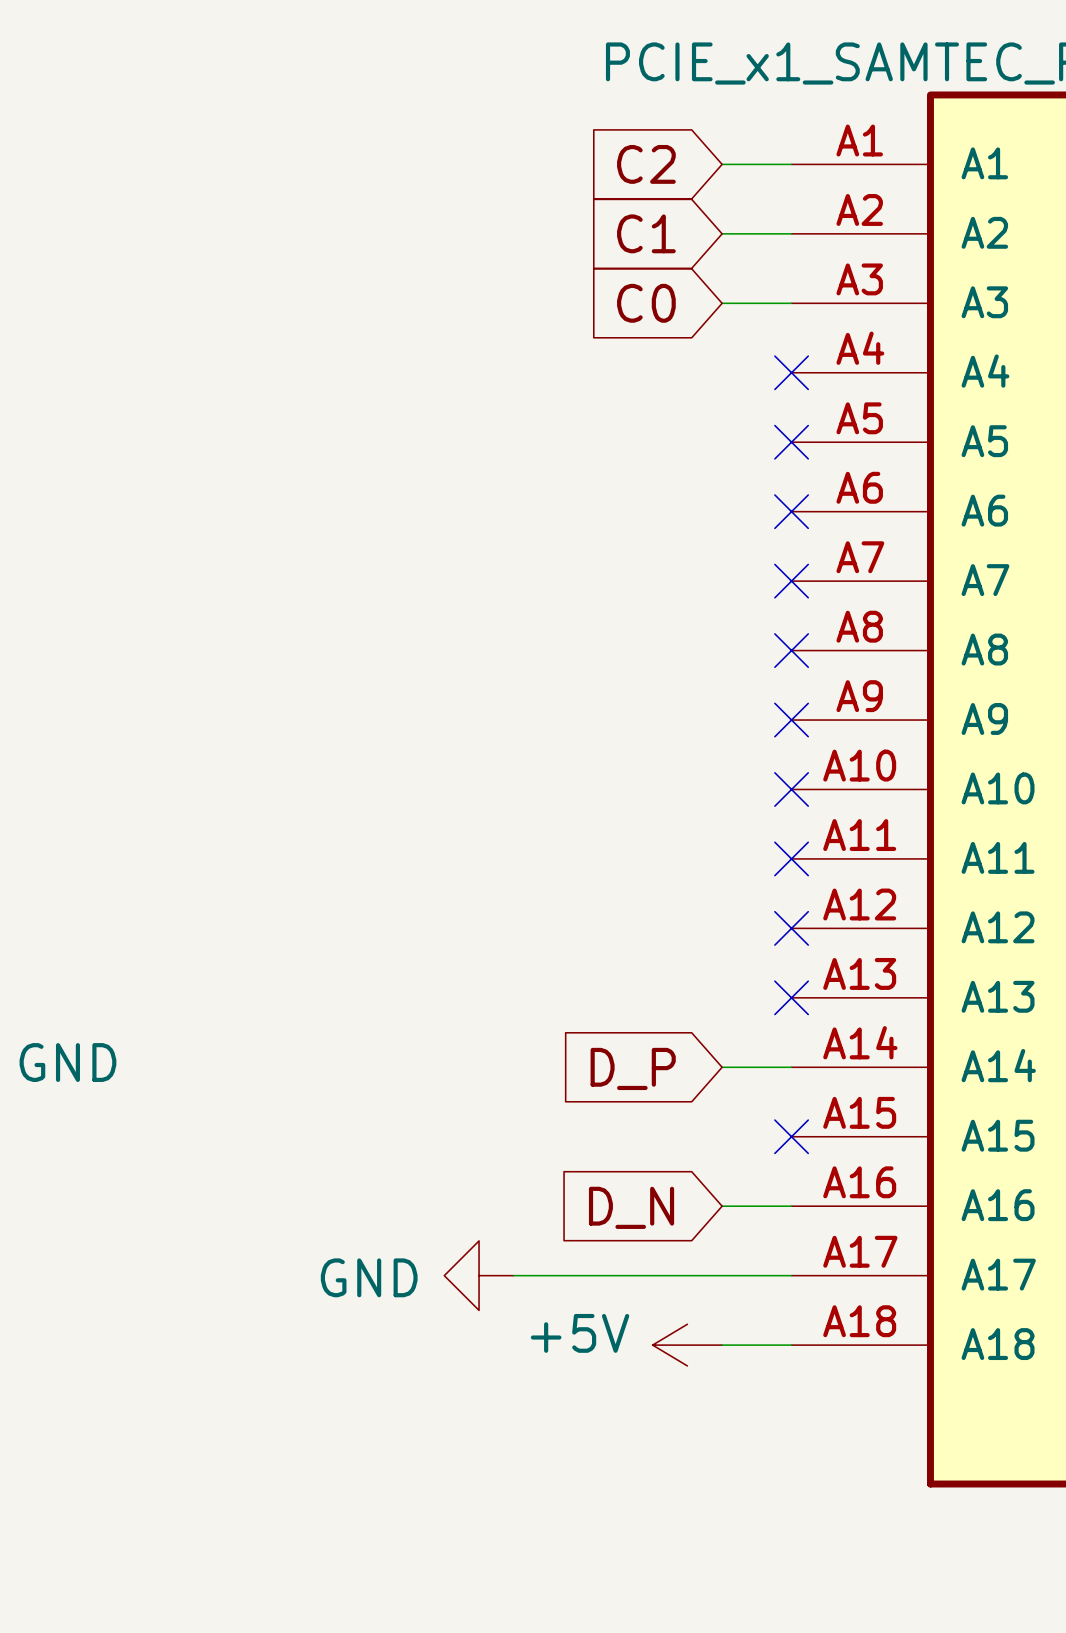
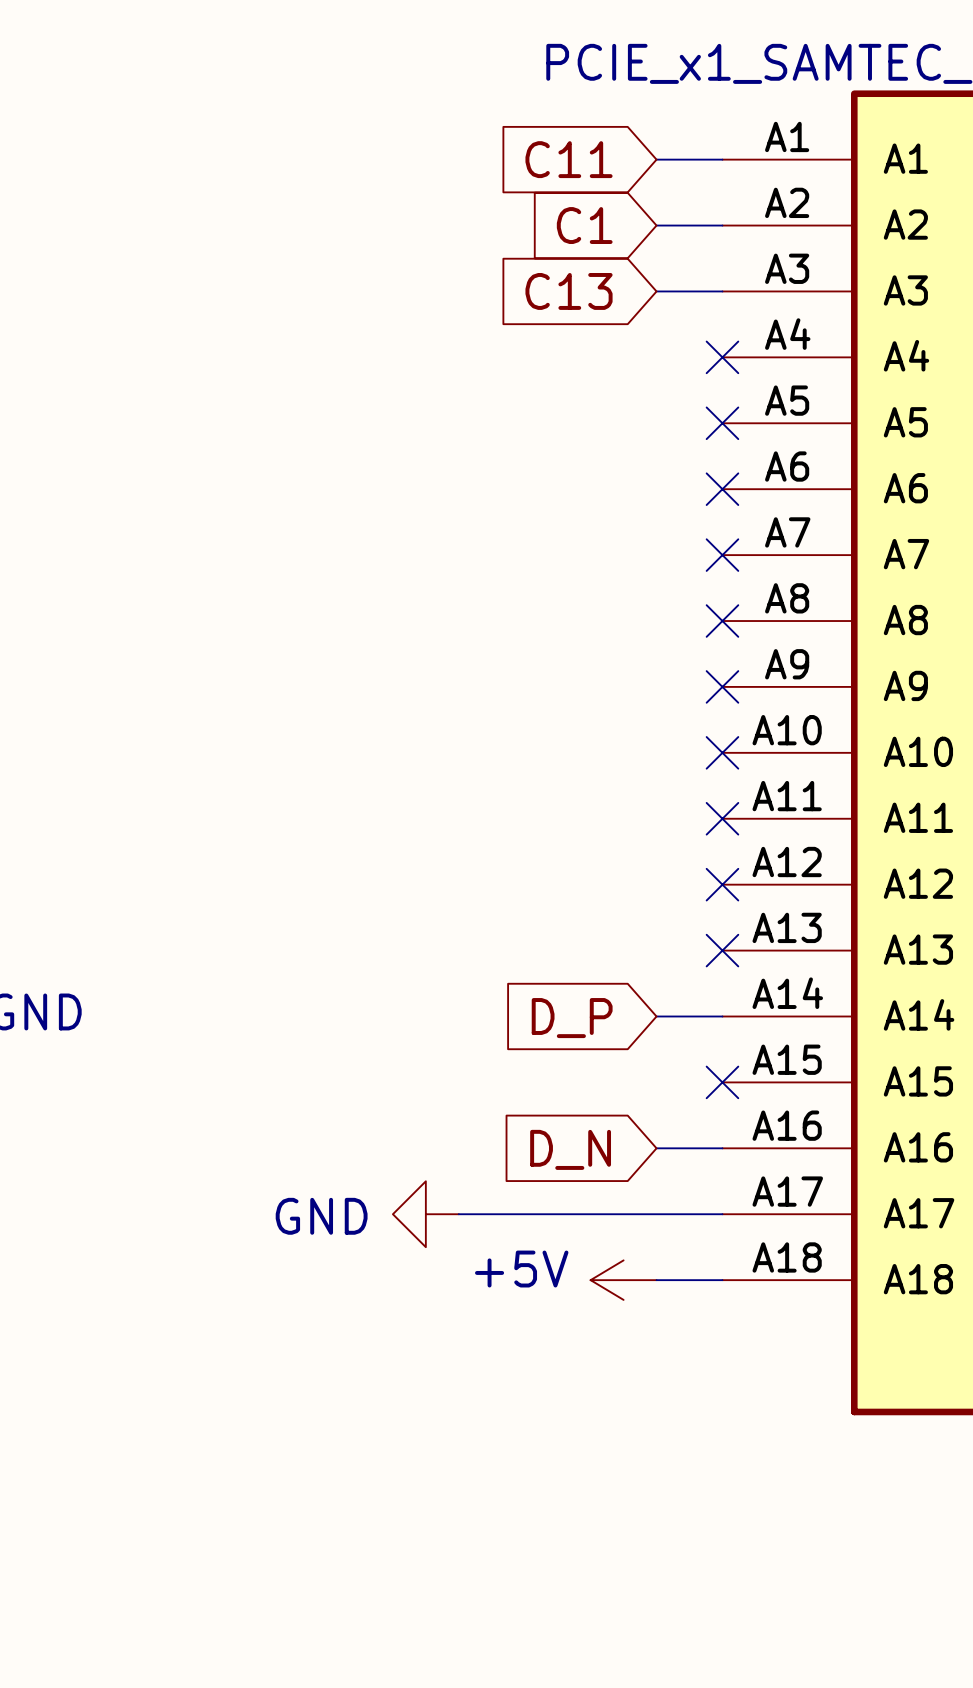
global label: C2 (646, 164) -> C11 (569, 159)
global label: C0 (646, 303) -> C13 (569, 291)

